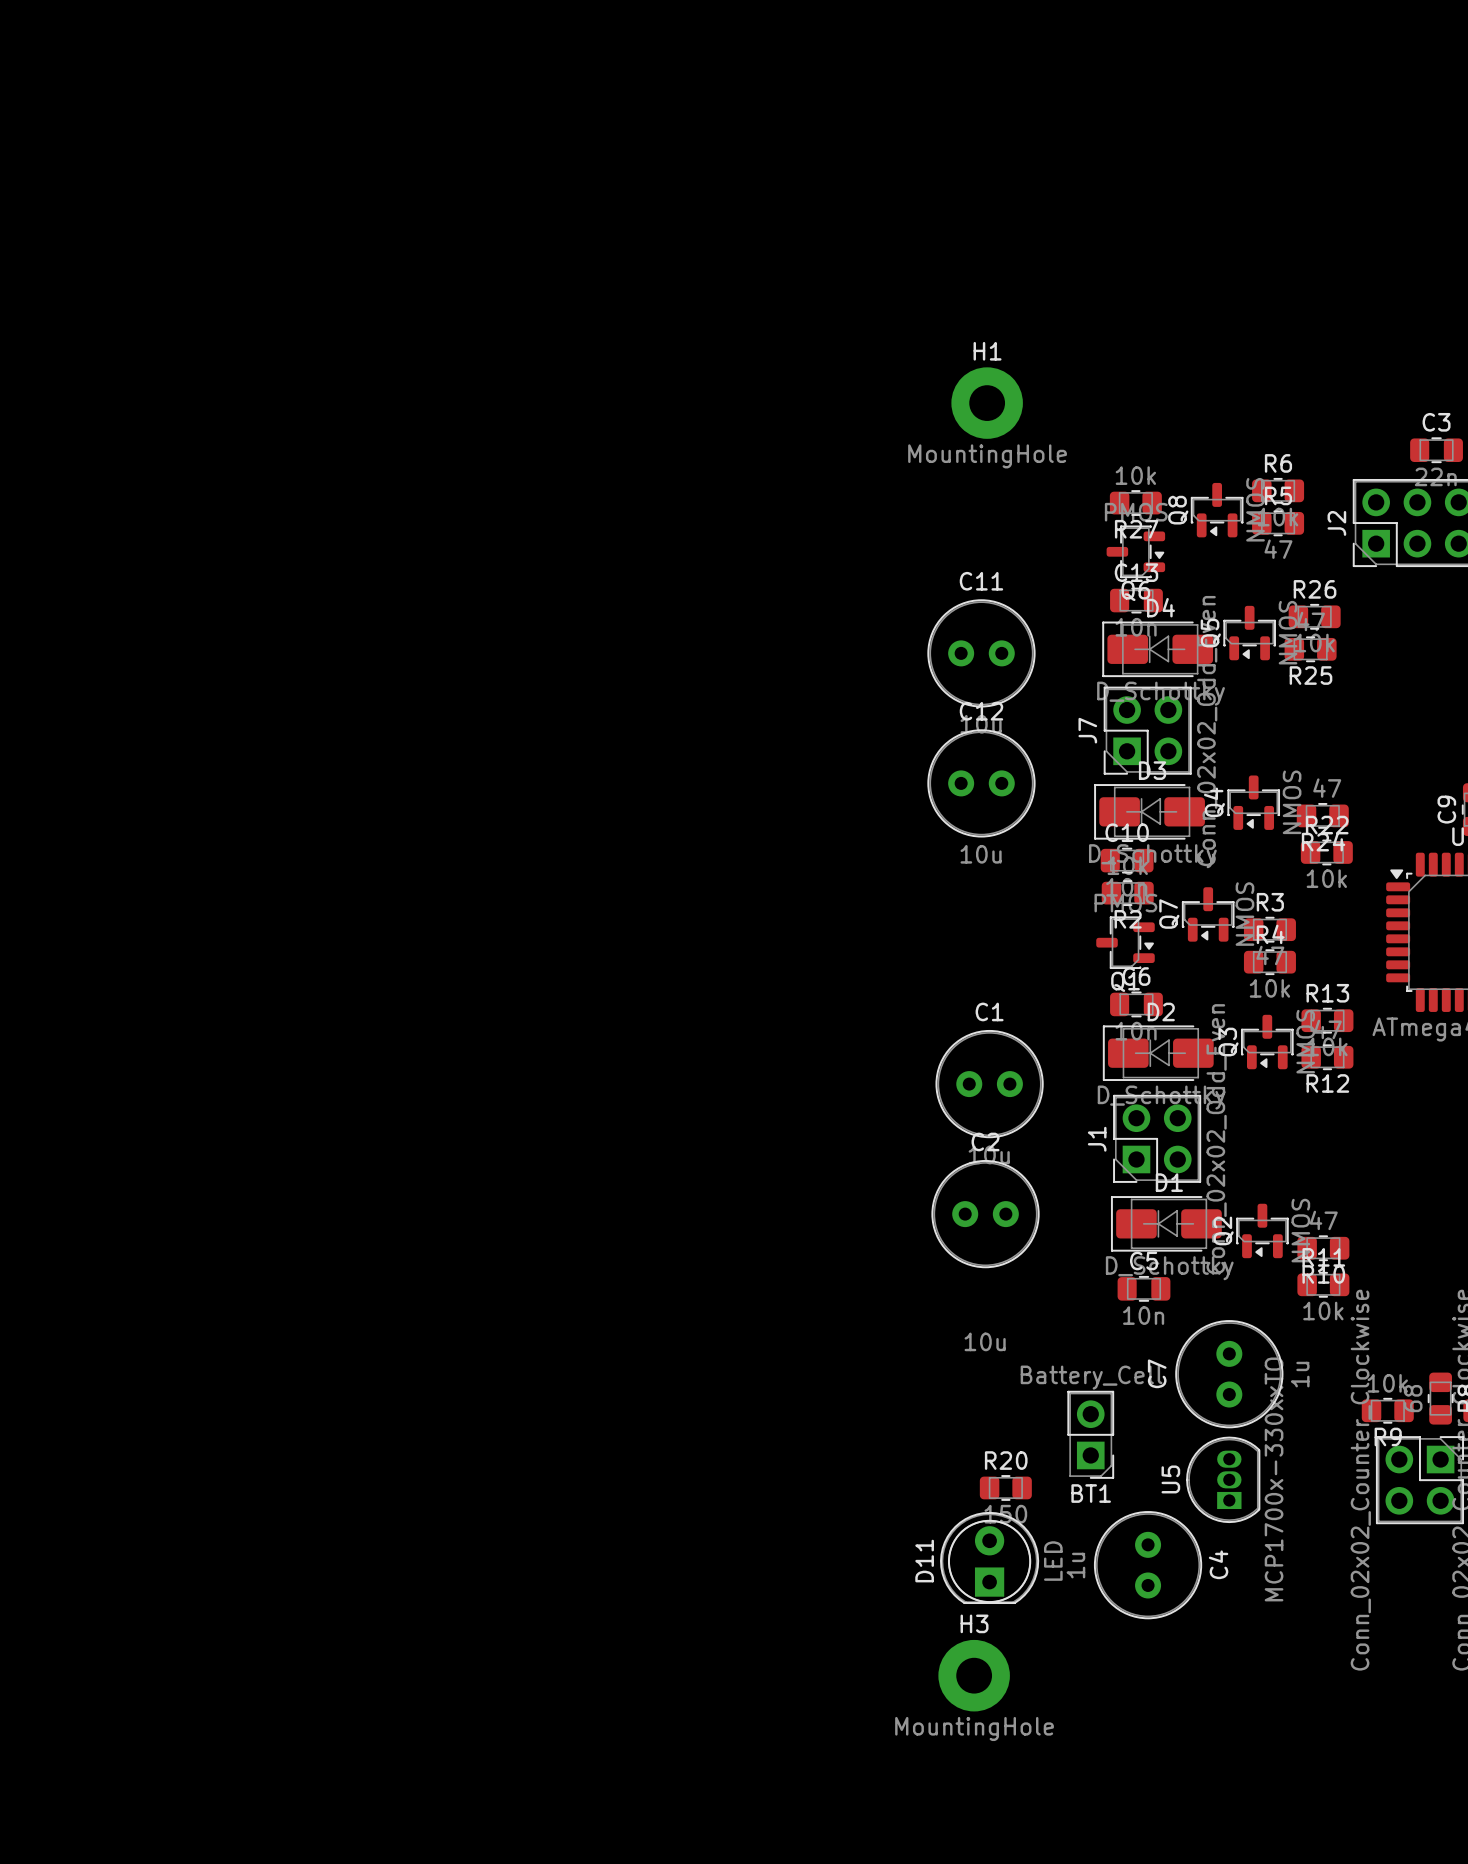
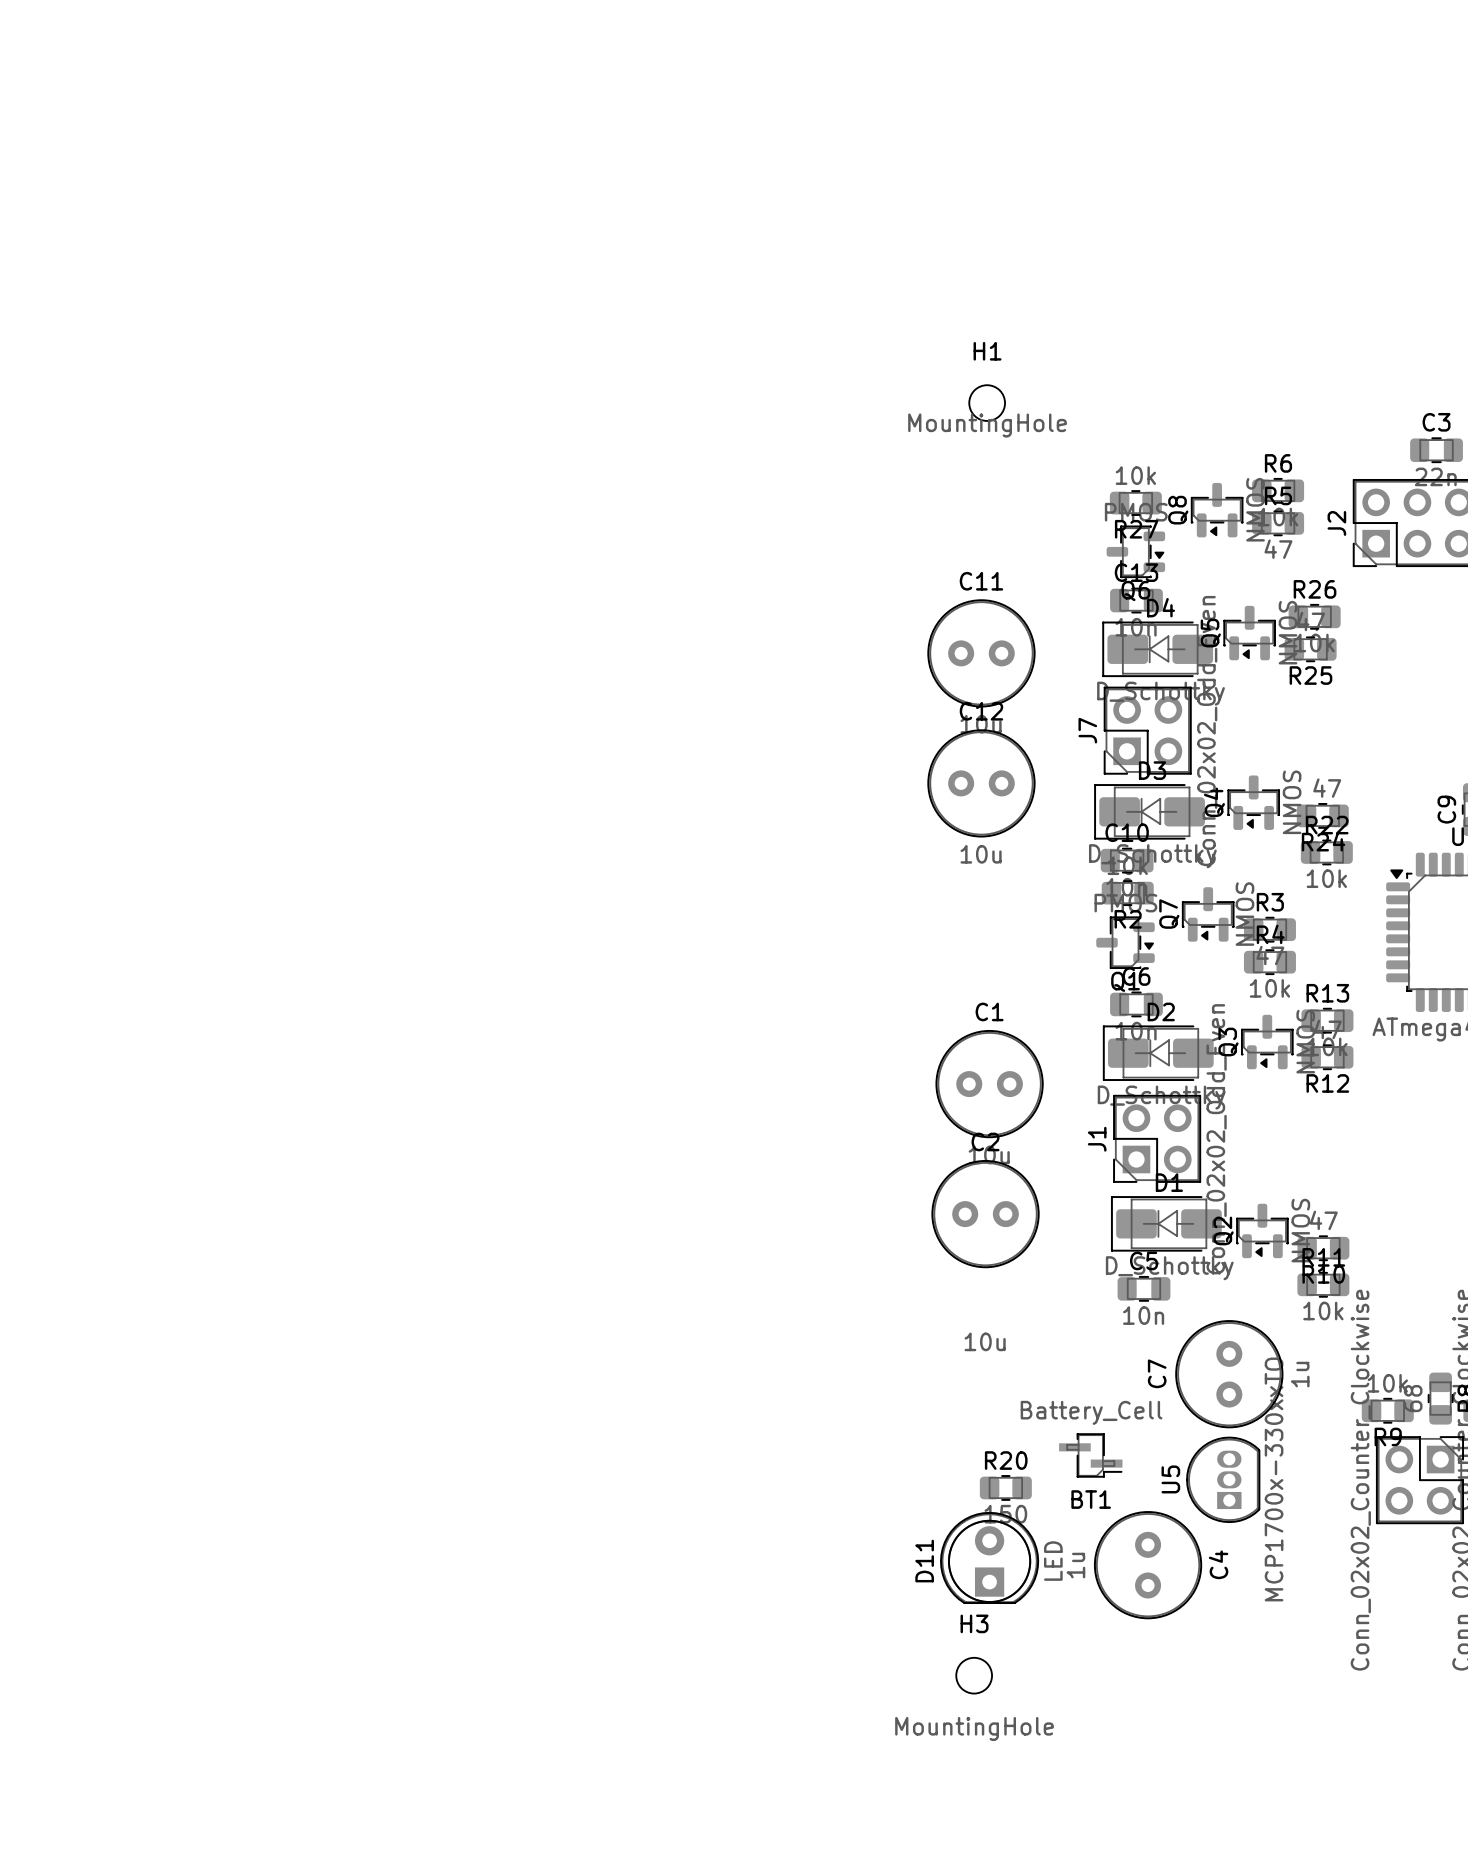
H1 footprint: [951, 367, 1023, 439] -> [969, 385, 1006, 421]
BT1 footprint: [1067, 1390, 1115, 1479] -> [1059, 1433, 1123, 1478]
H3 footprint: [938, 1639, 1010, 1712] -> [956, 1657, 993, 1694]

